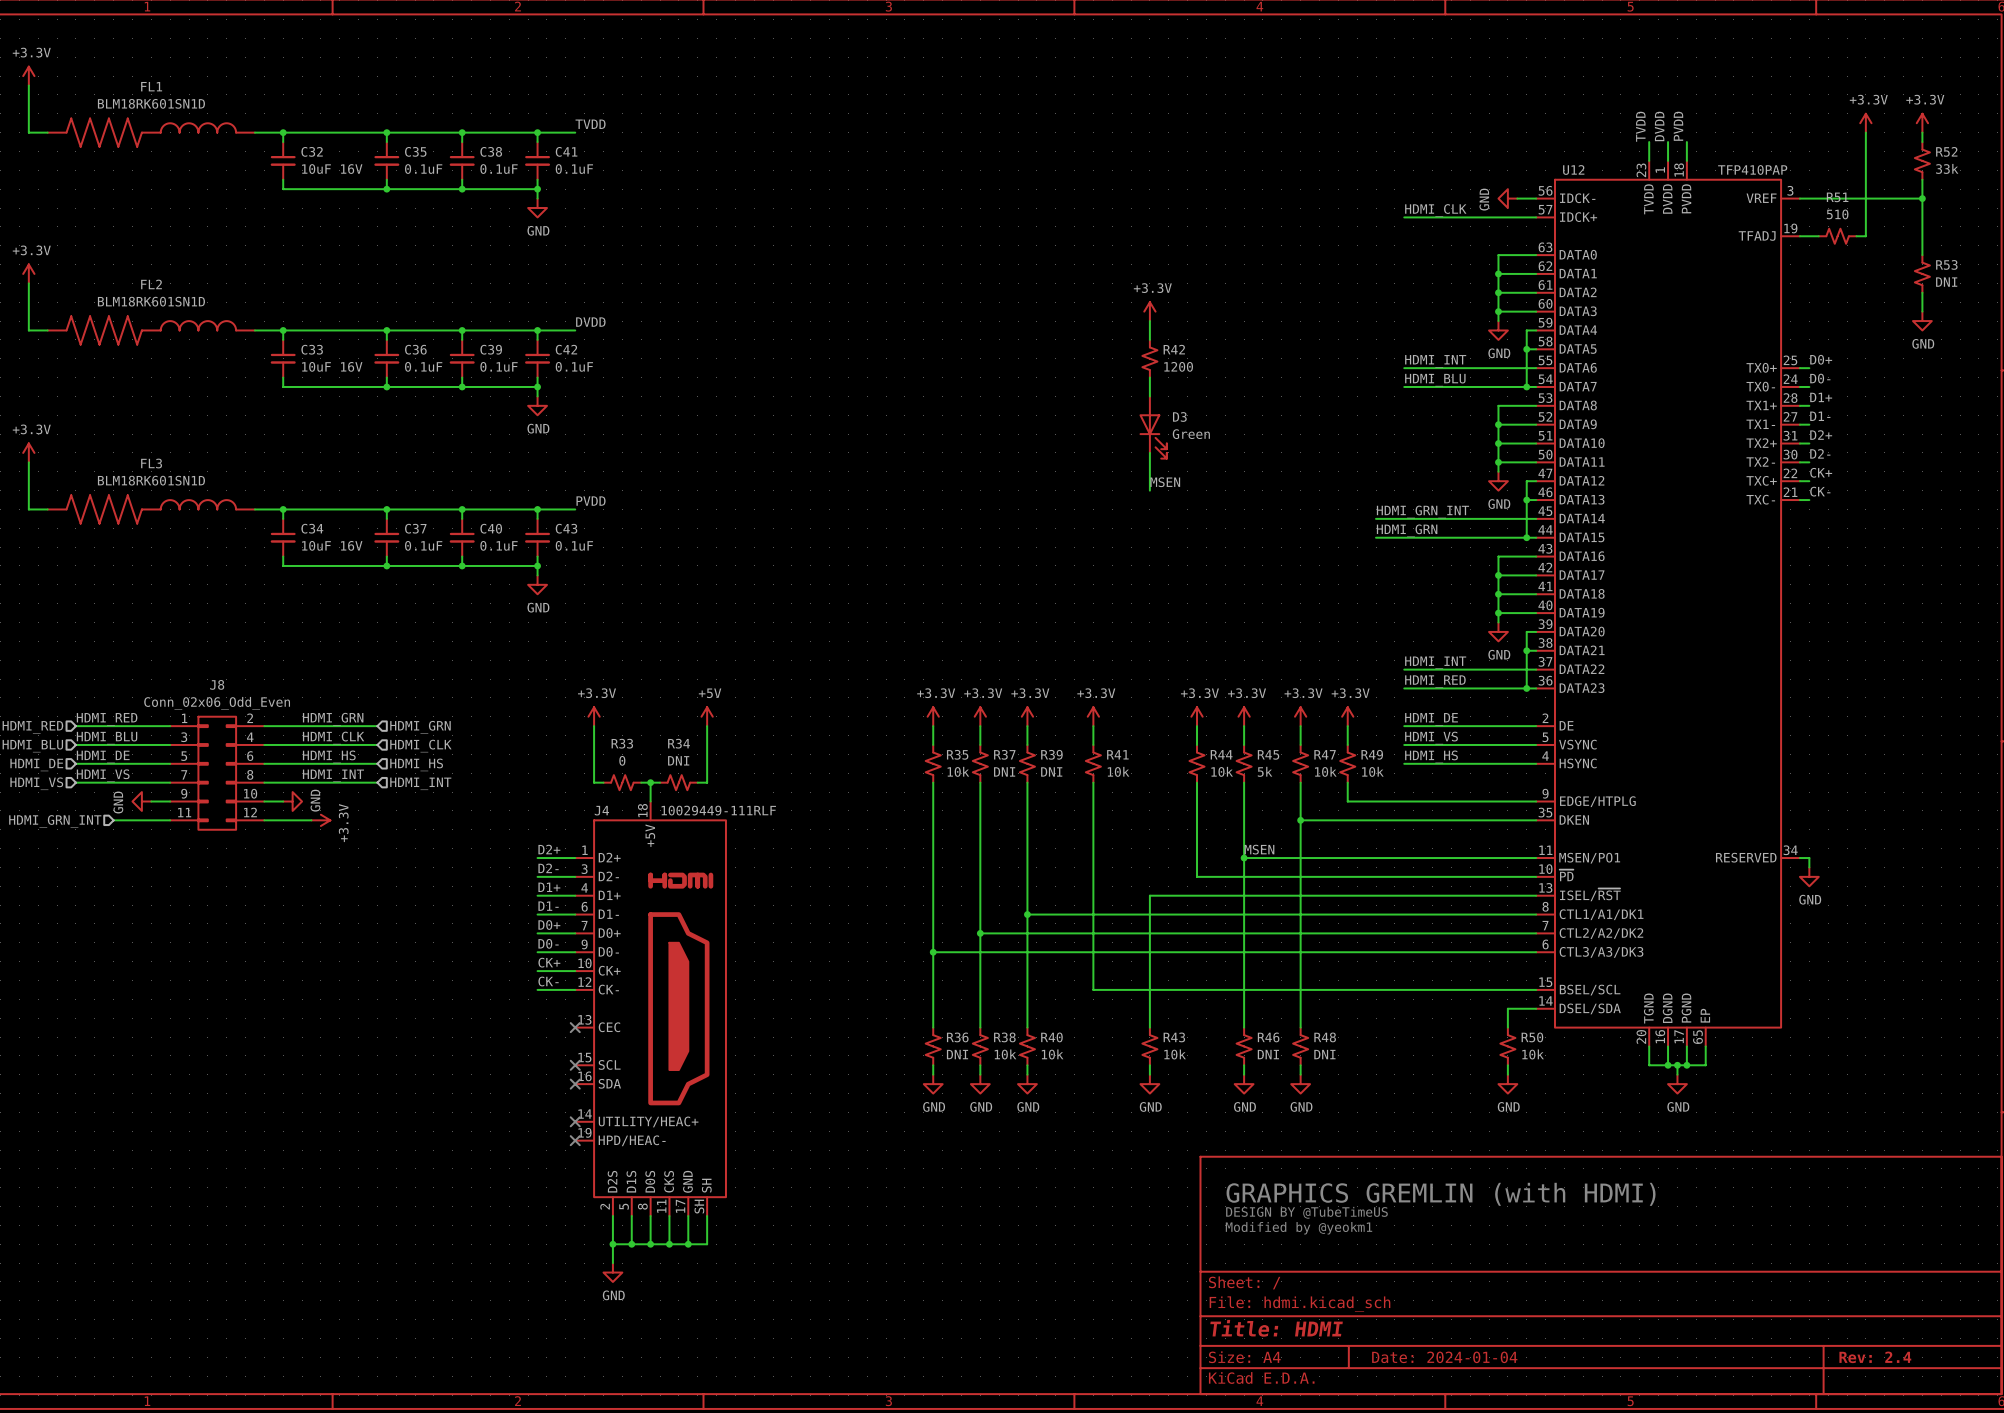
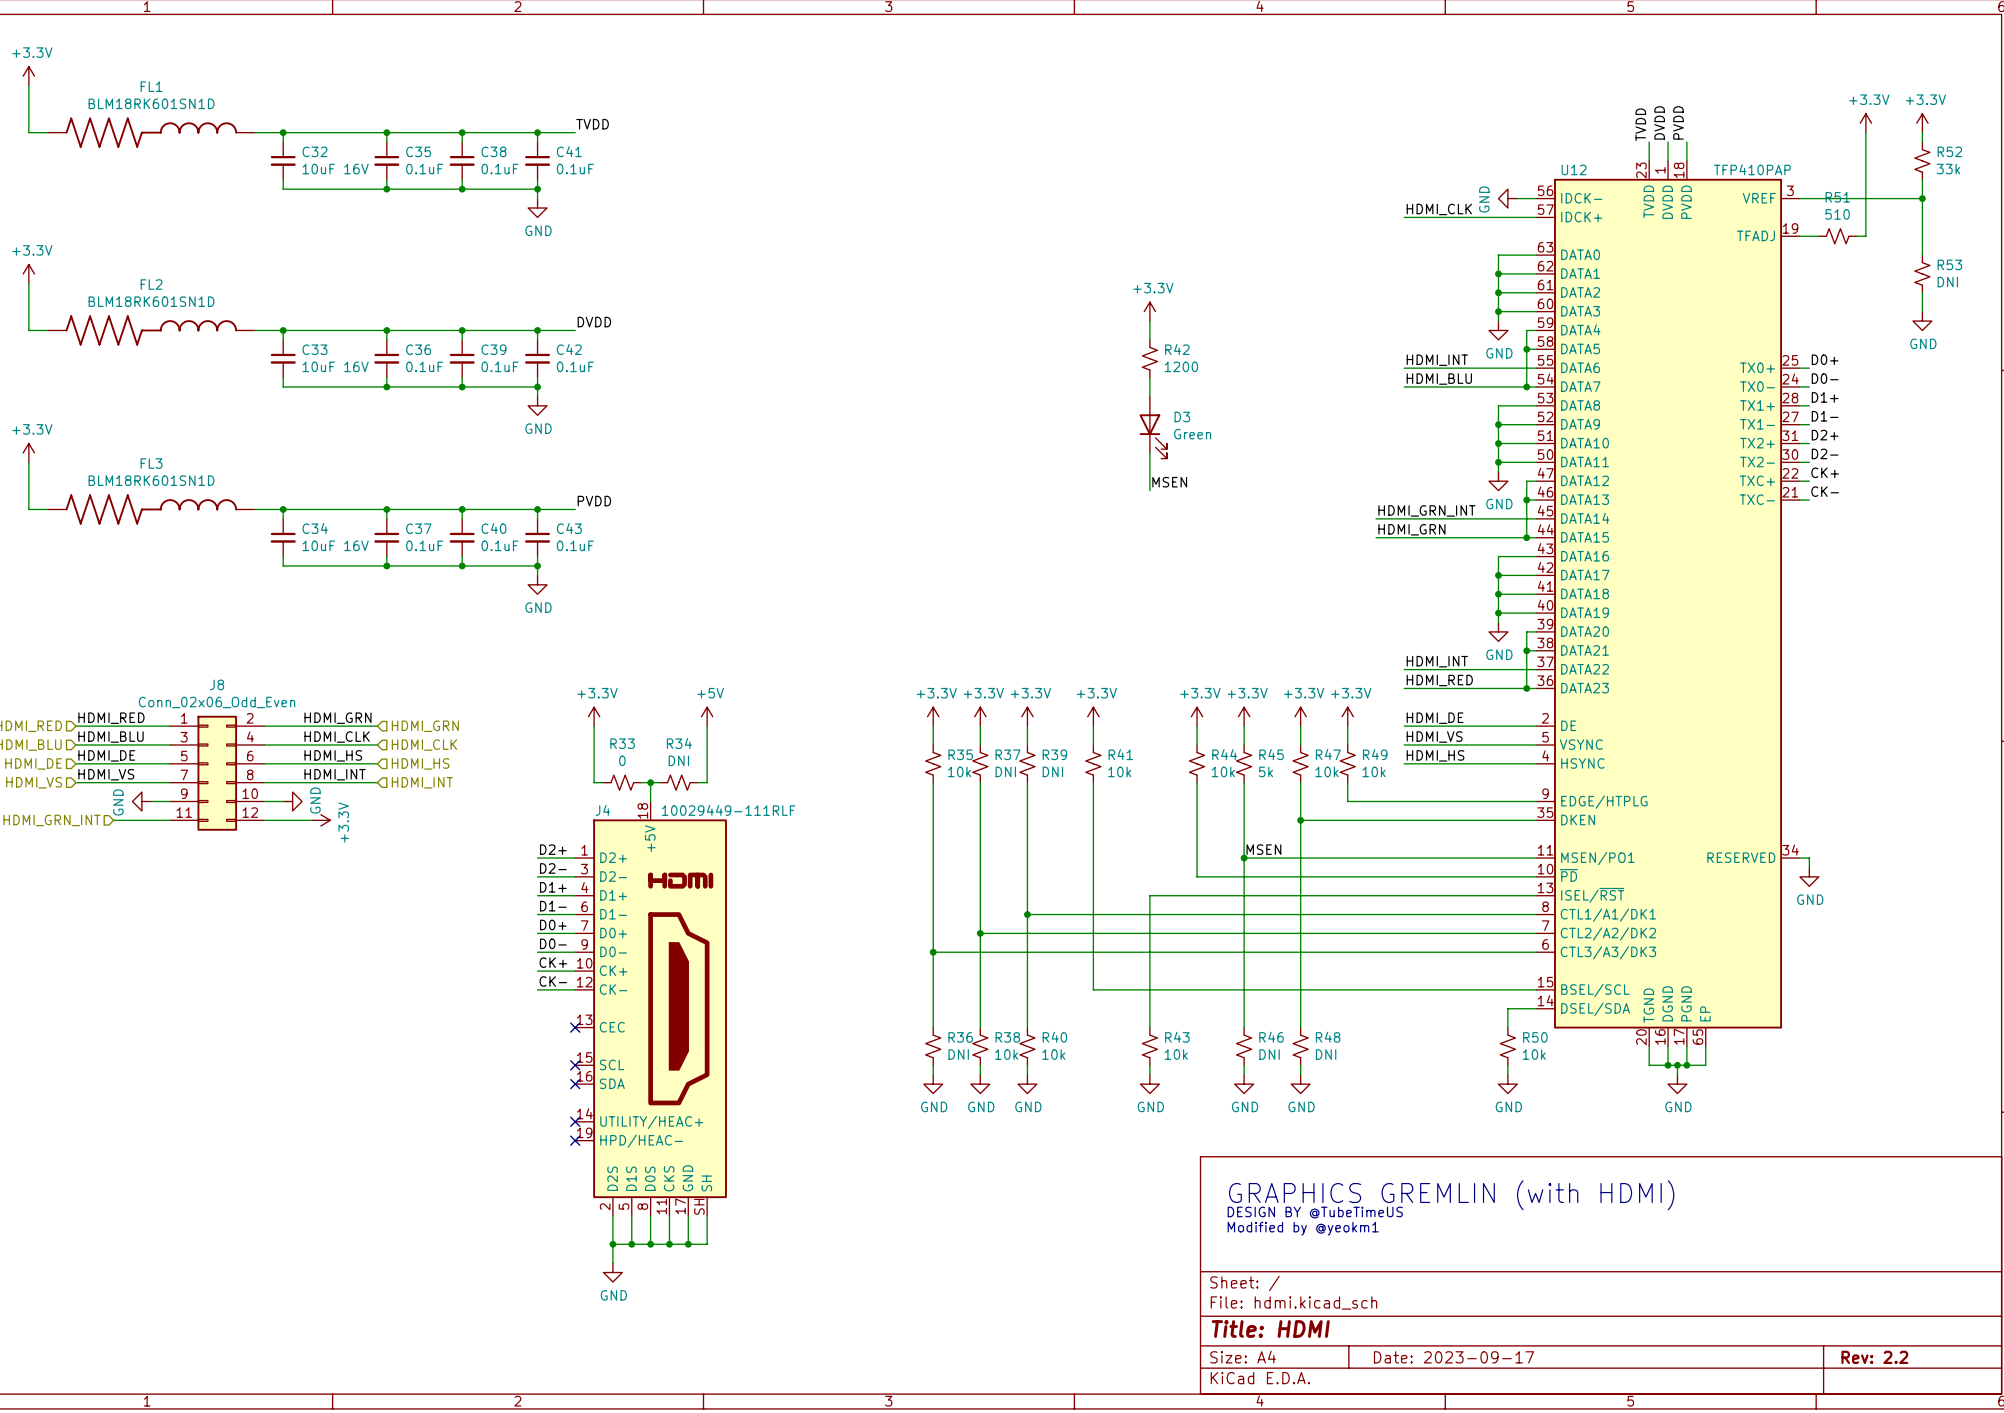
title block: Date: 2024-01-04 (1444, 1357) -> Date: 2023-09-17 (1453, 1357)
title block: Rev: 2.4 (1875, 1357) -> Rev: 2.2 (1874, 1357)

